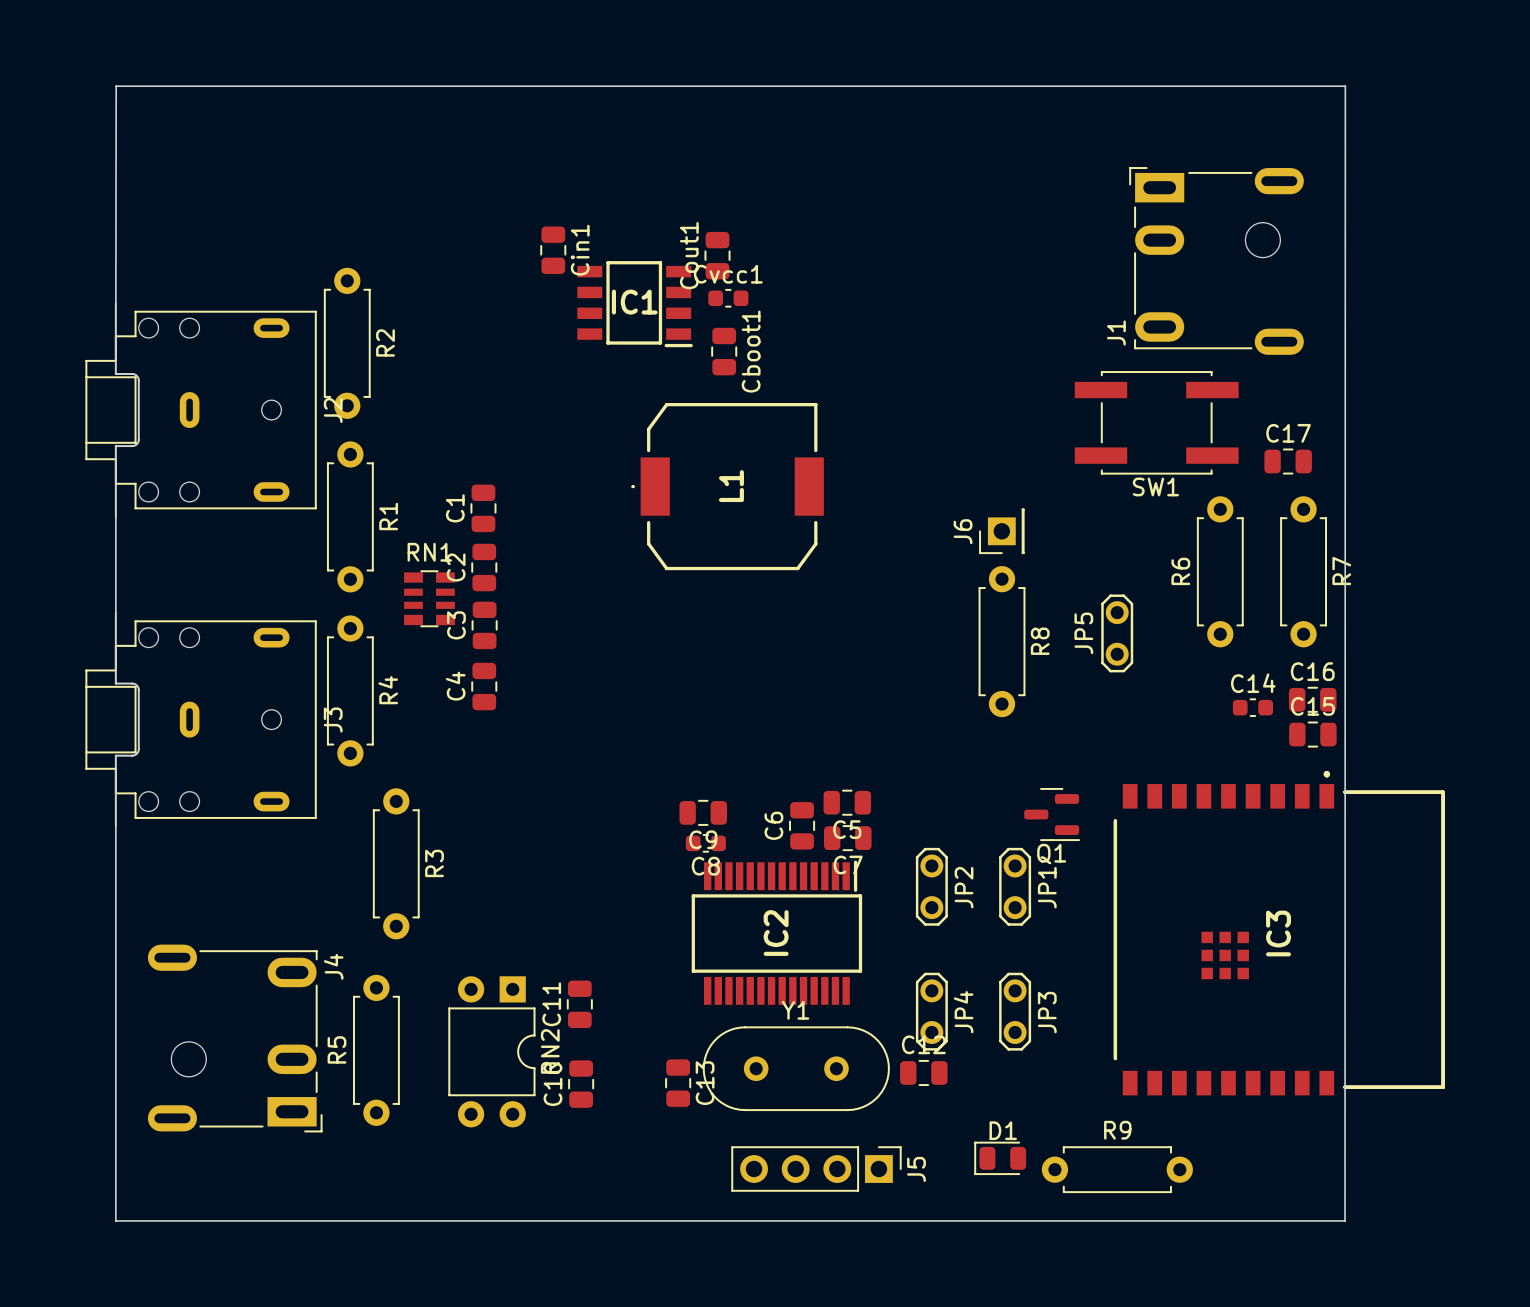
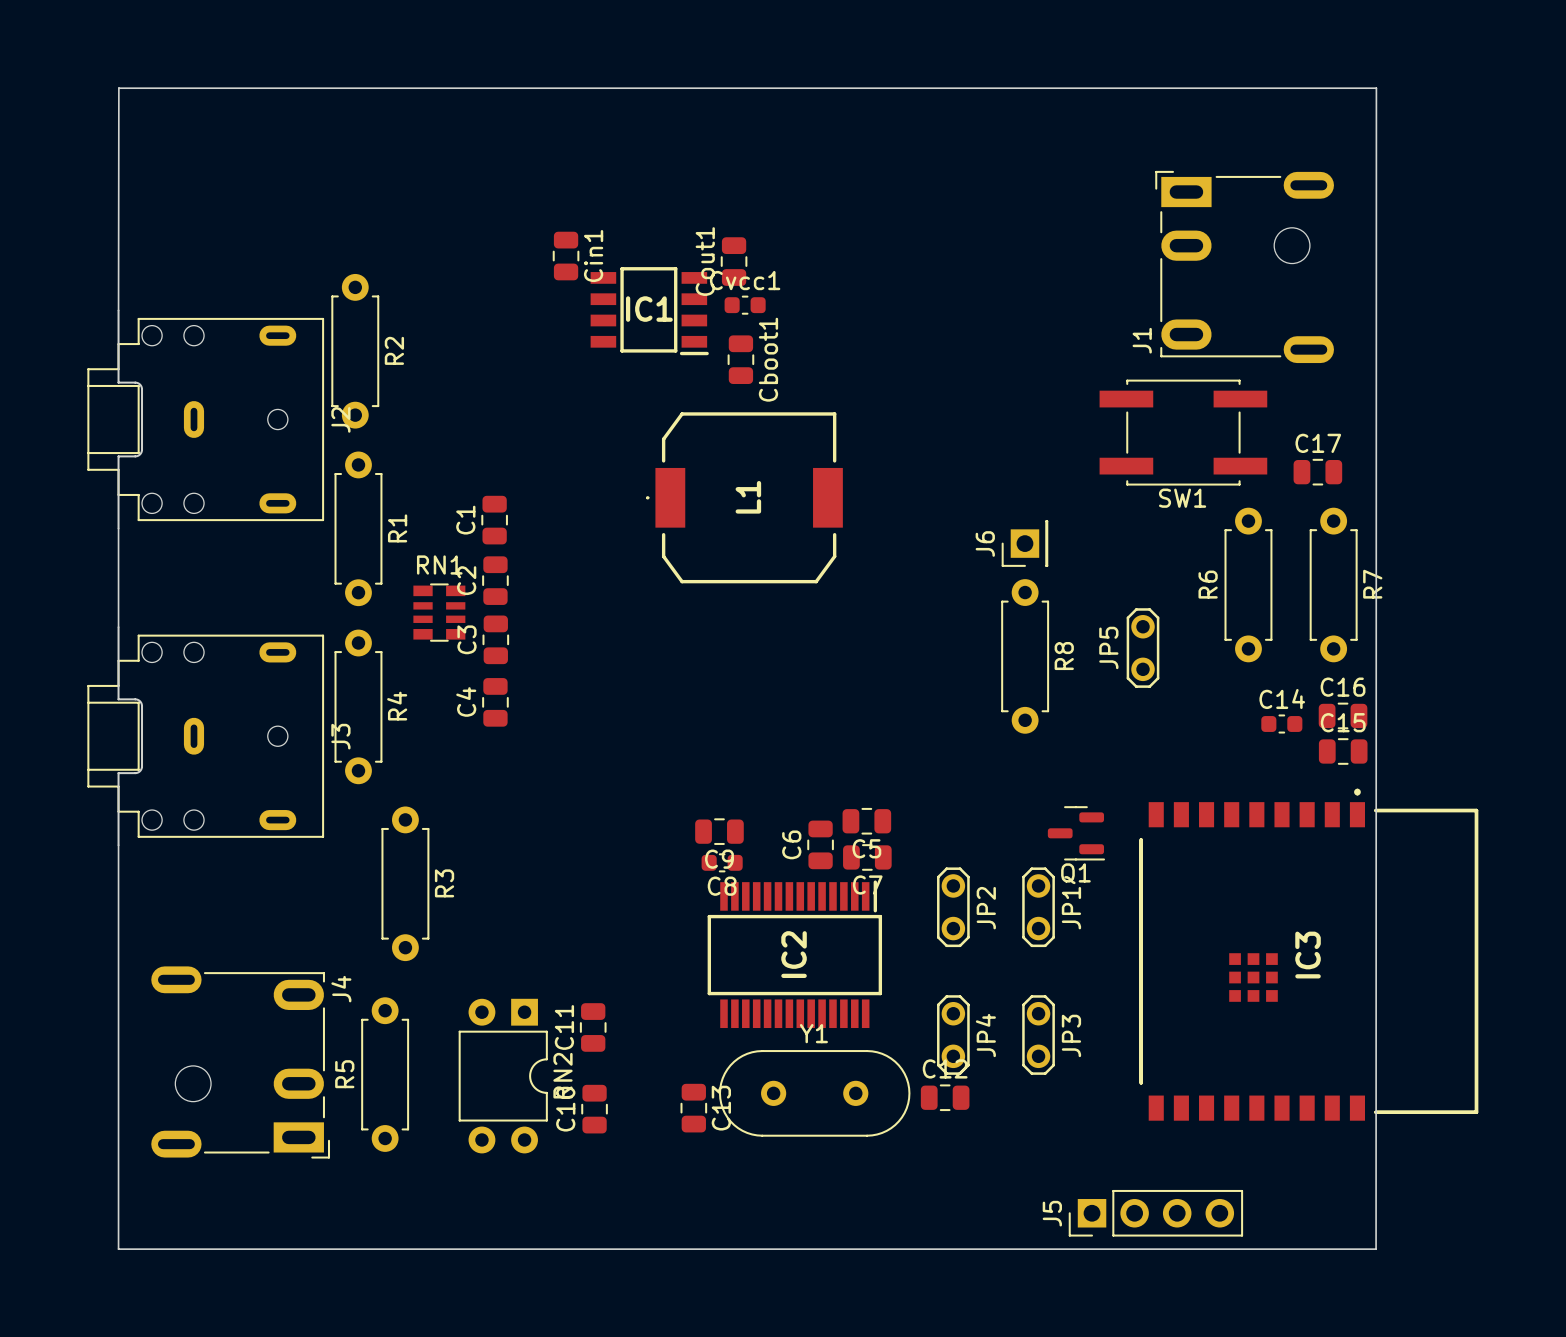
D1: (1000, 1158) -> none
J5 rotation: 0° (816, 1169) -> 180° (1155, 1213)
J5 position: (816, 1169) -> (1155, 1213)
R9: (1117, 1169) -> none

